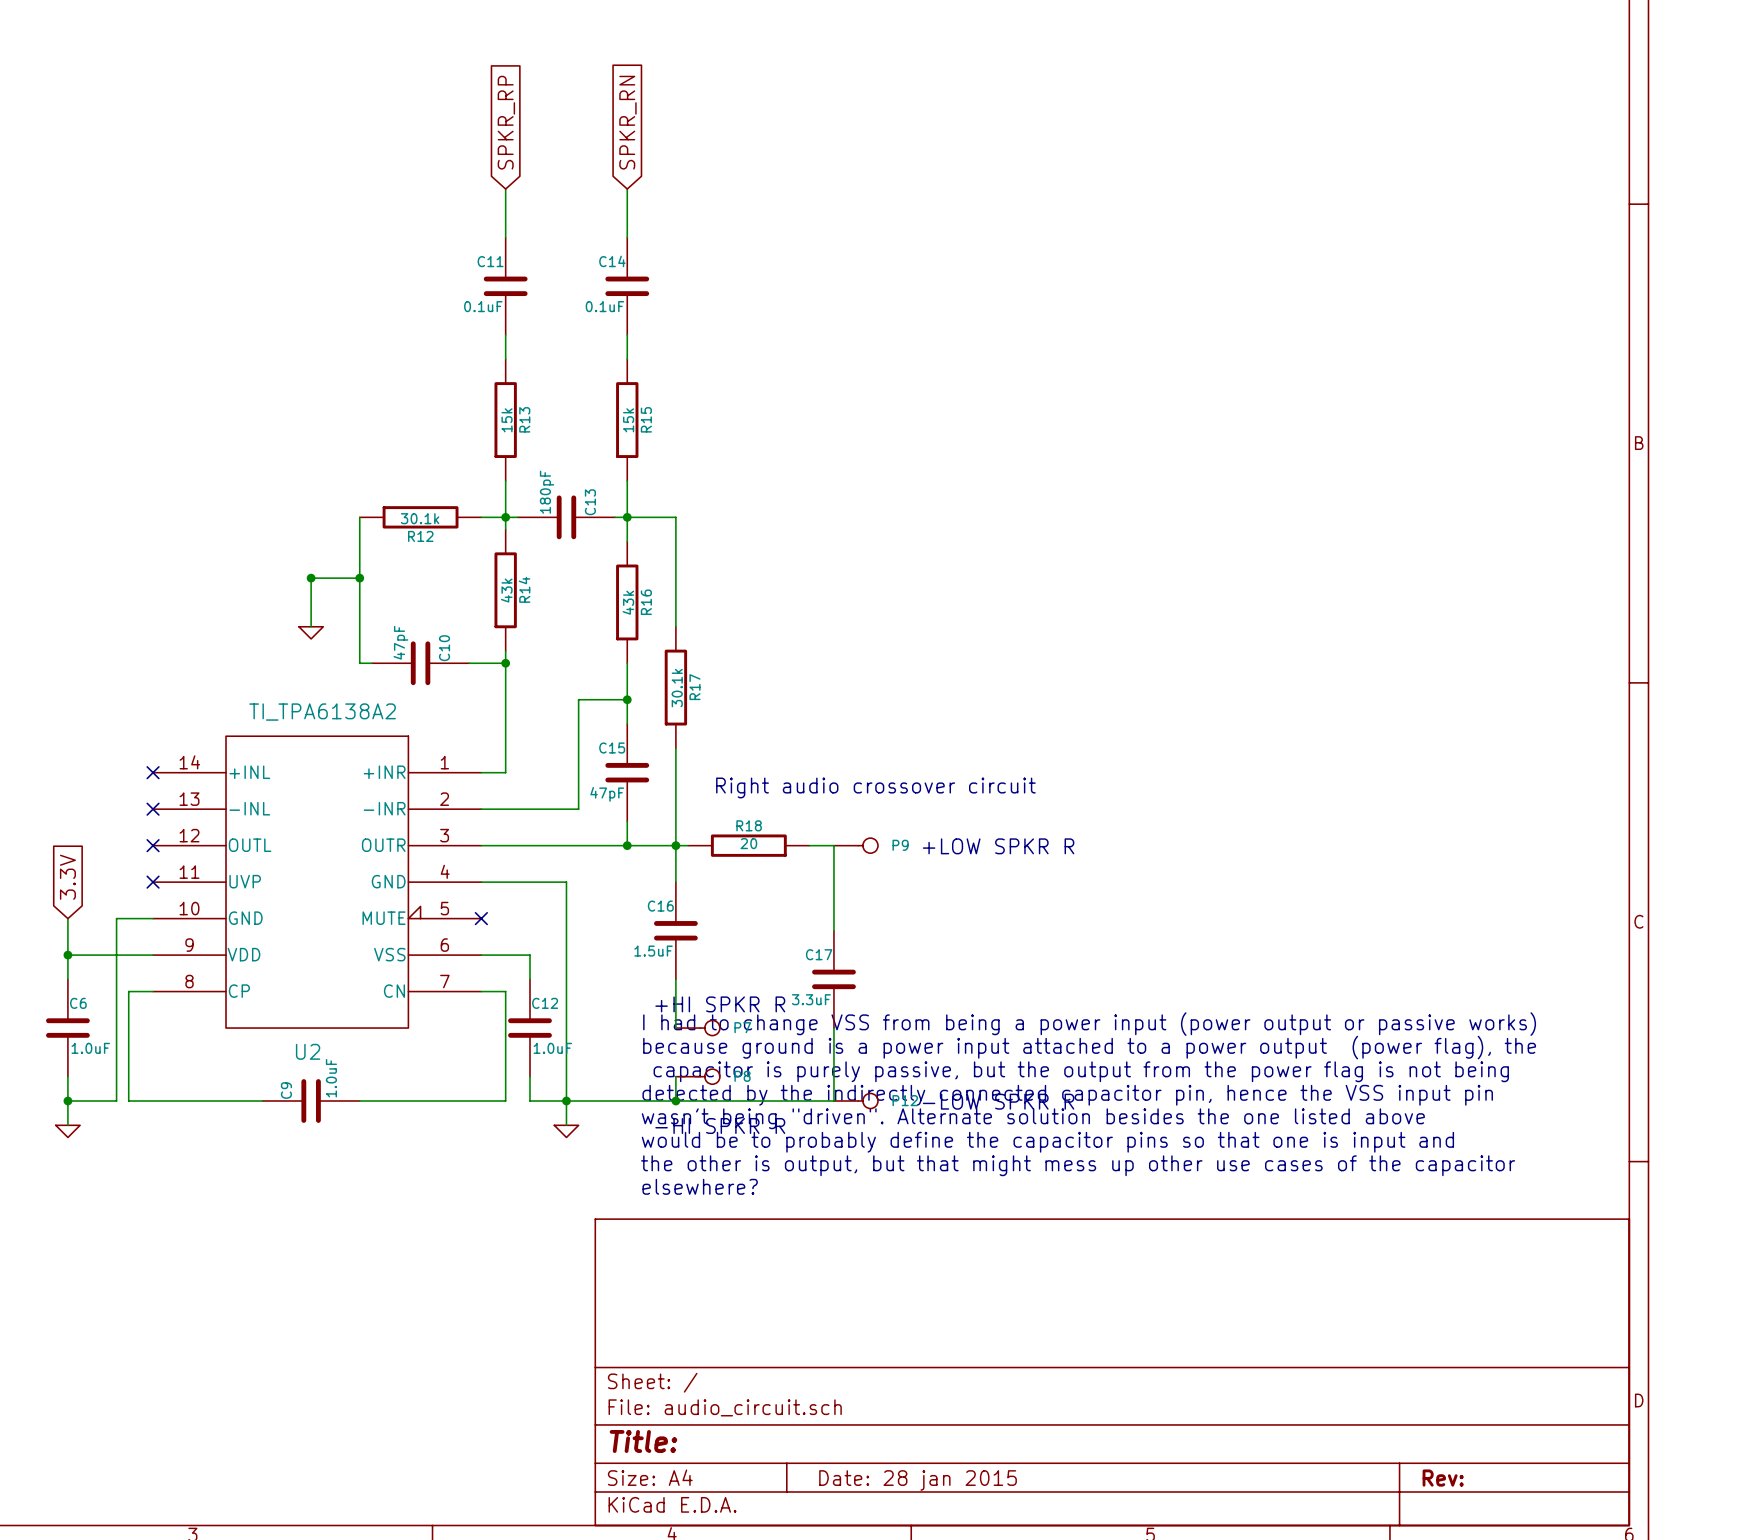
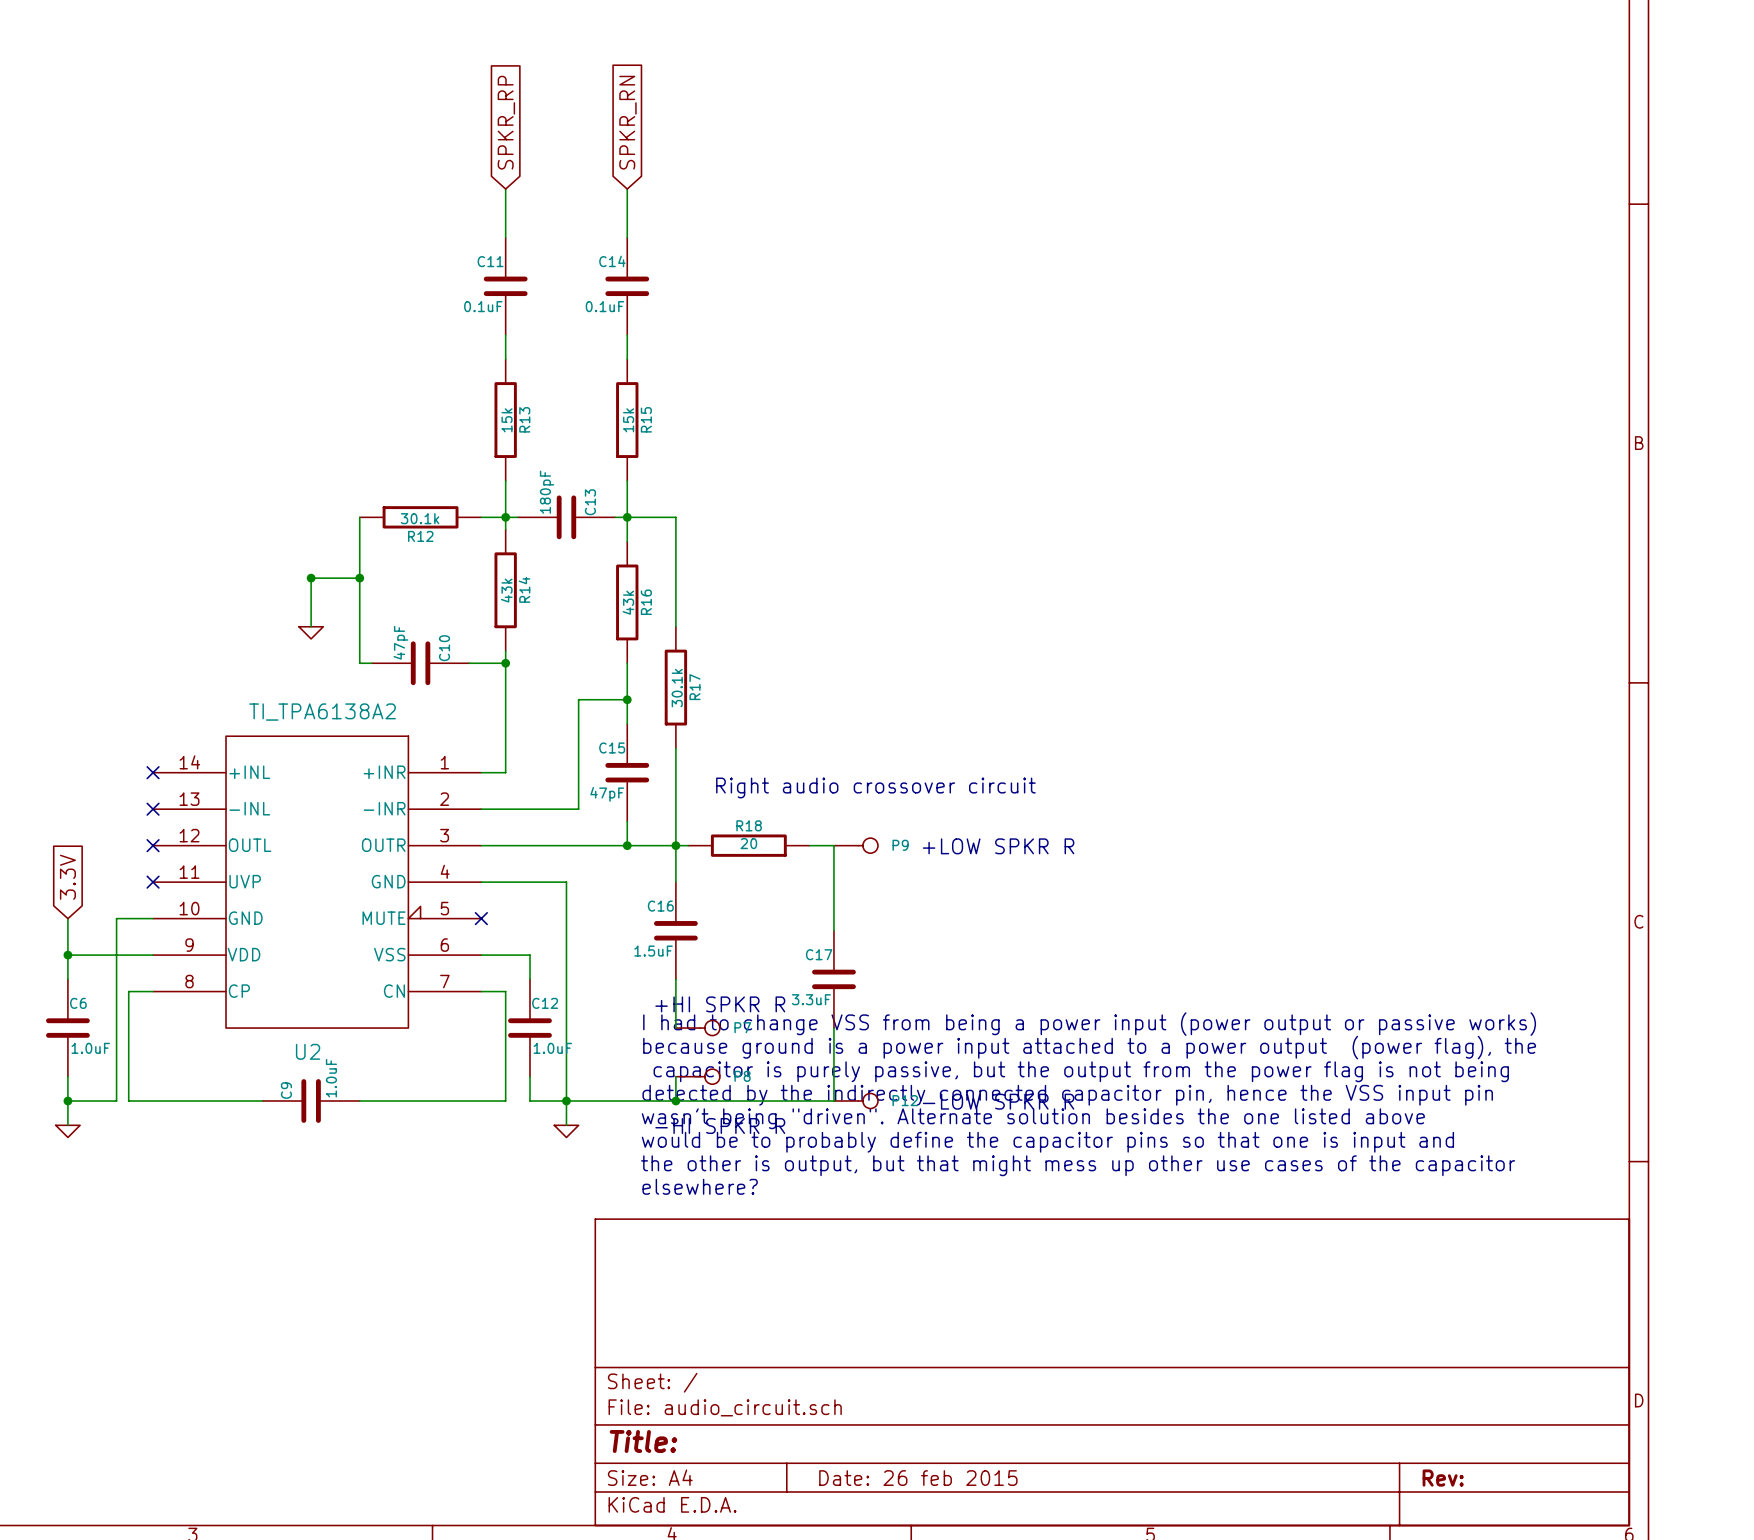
title block: Date: 28 jan 2015 (918, 1480) -> Date: 26 feb 2015 (918, 1478)

